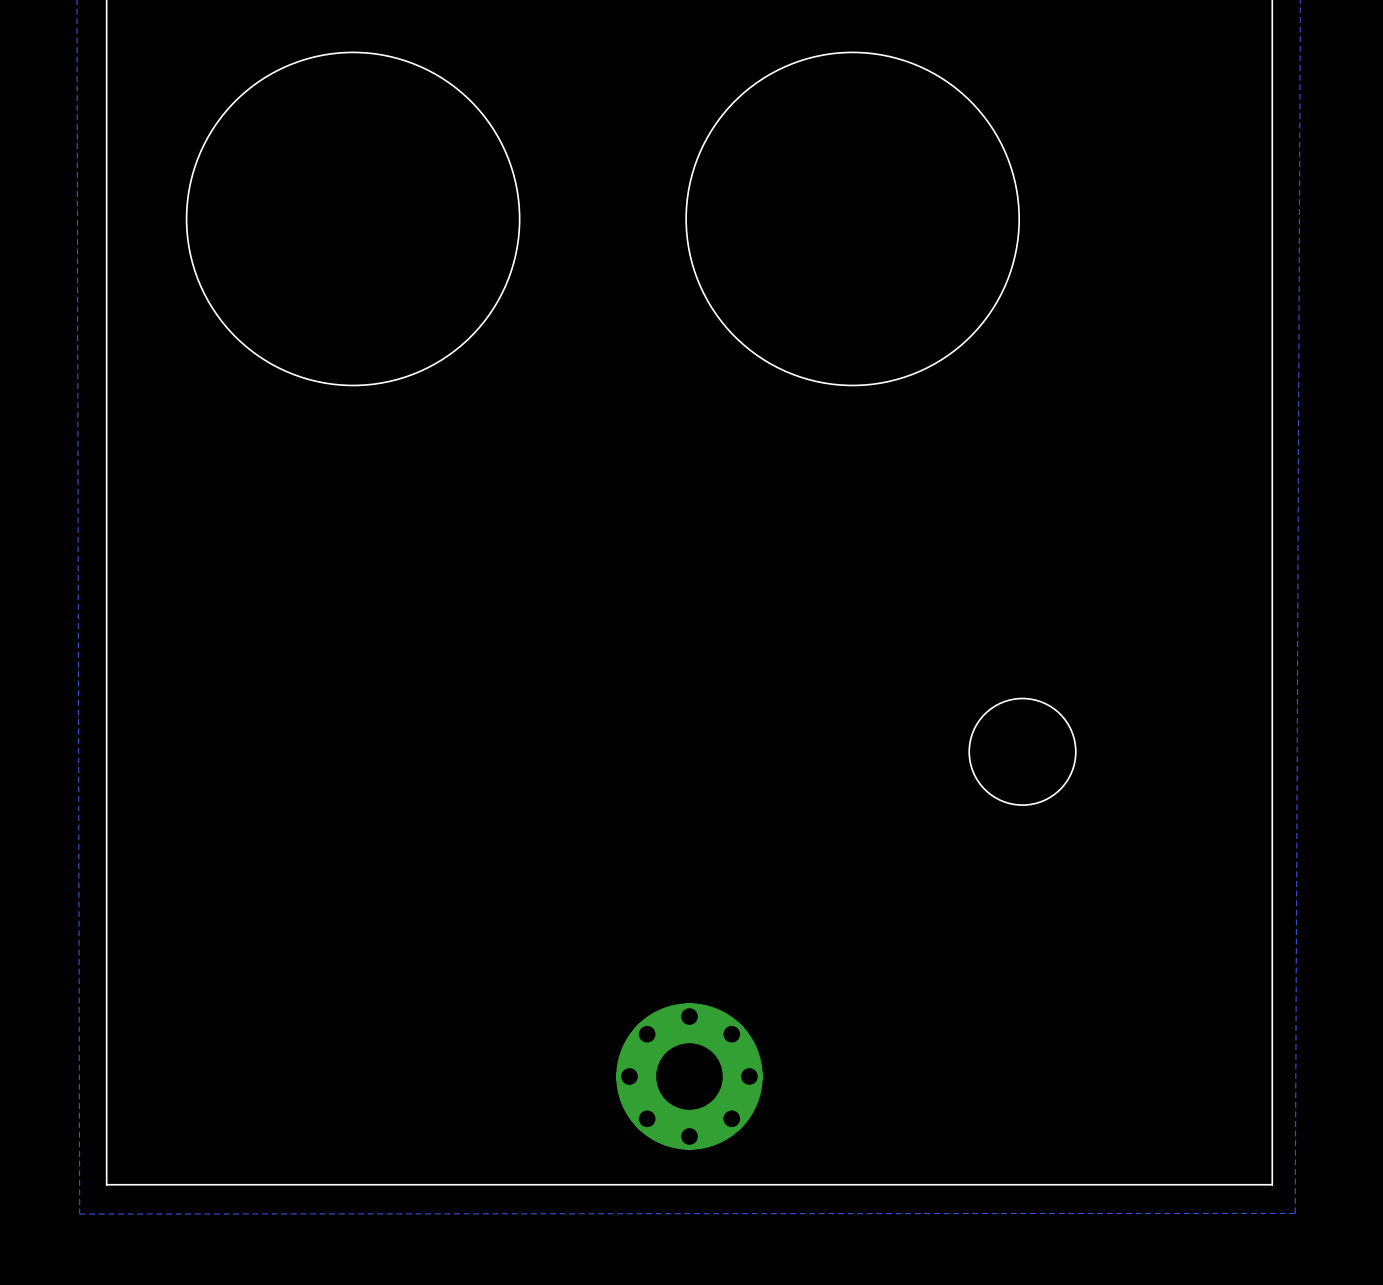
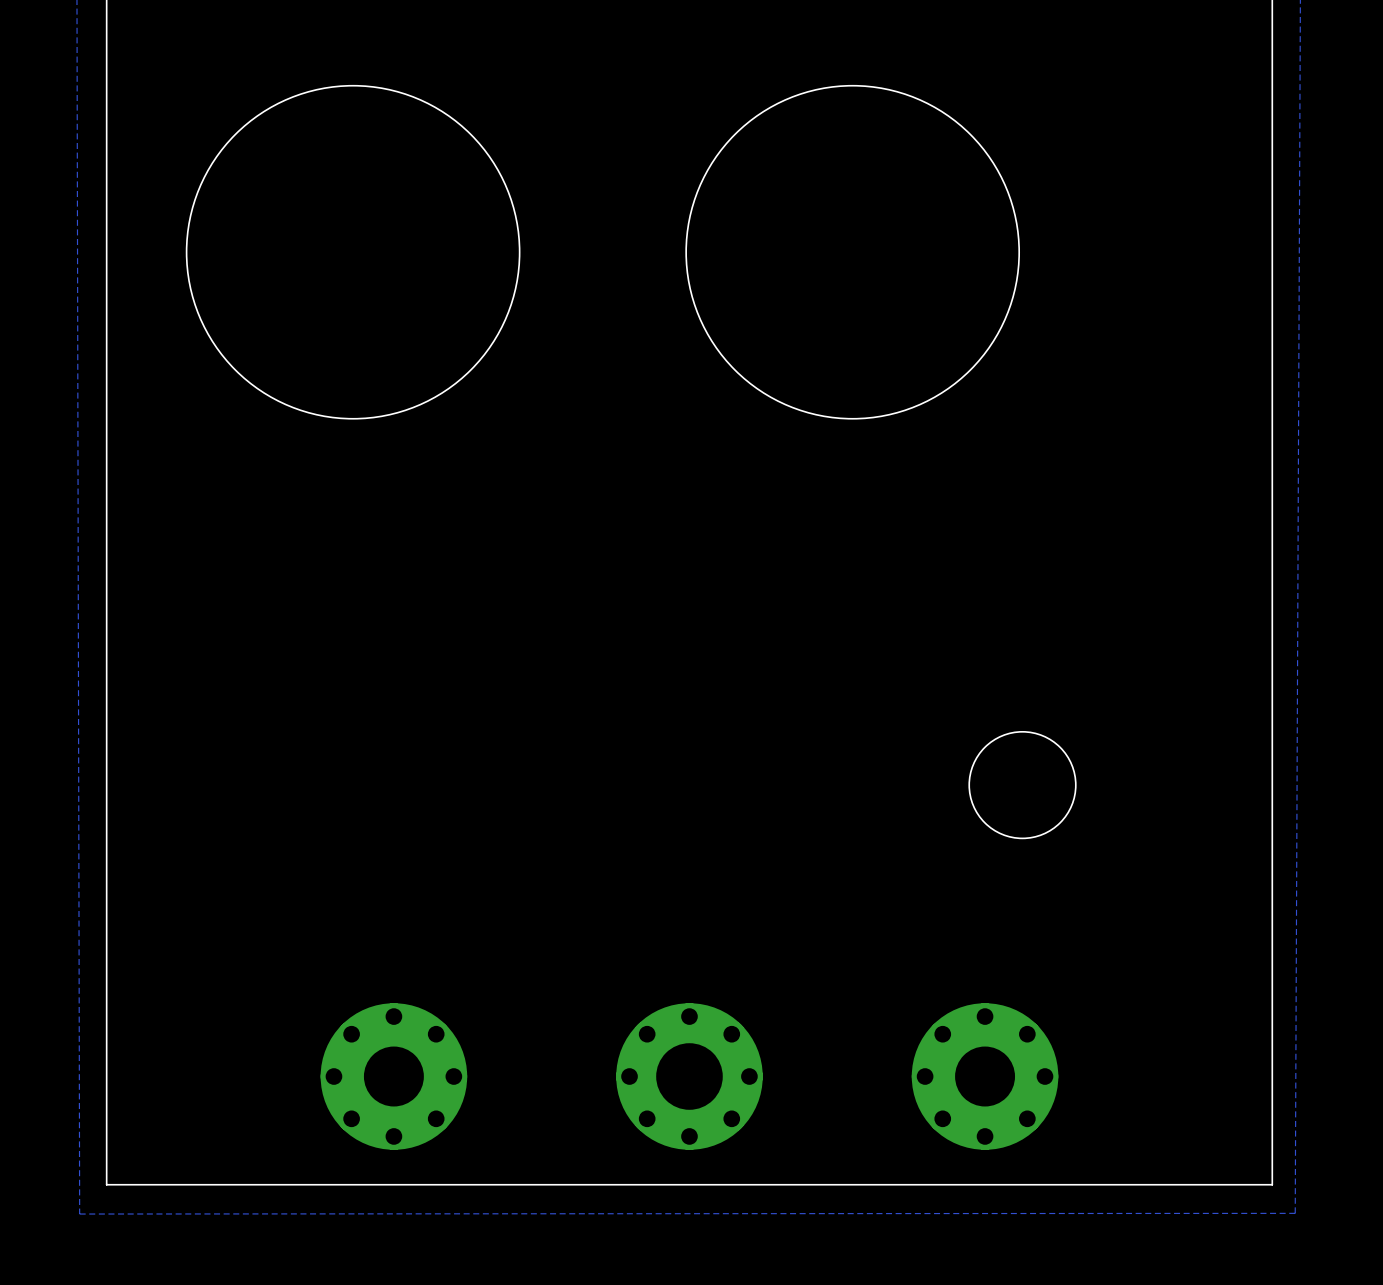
round board edge position: (353, 218) -> (353, 252)
round board edge position: (852, 218) -> (852, 252)
round board edge position: (1022, 751) -> (1022, 785)
part: none -> (393, 1076)
part: none -> (985, 1076)

